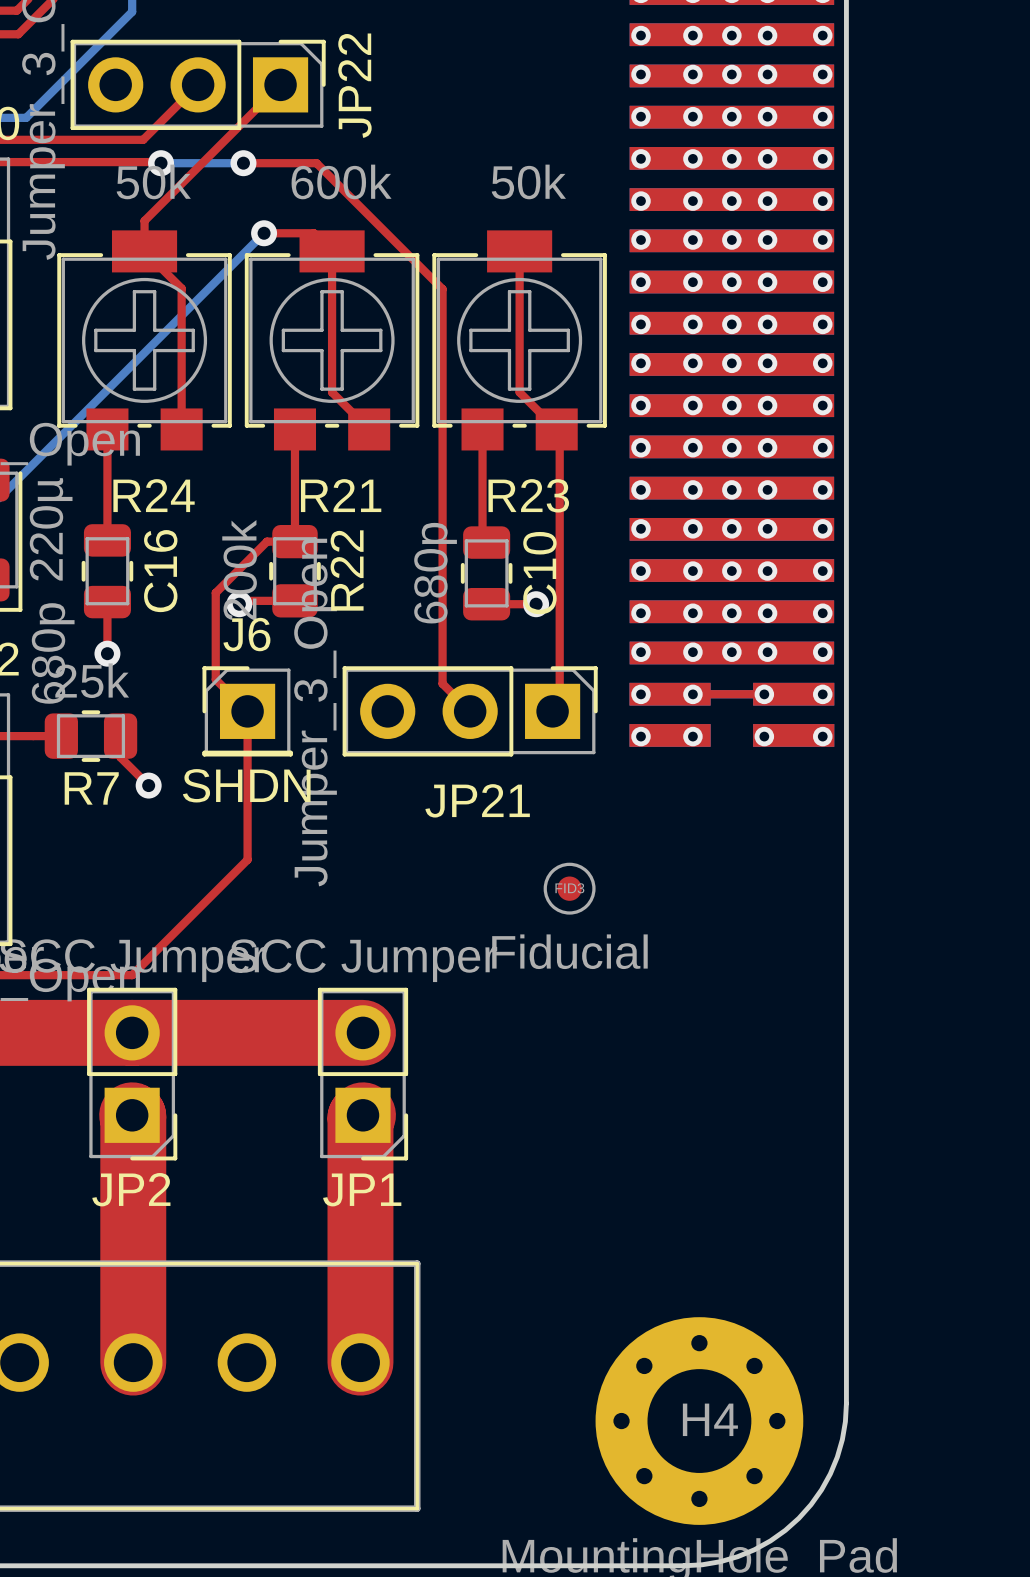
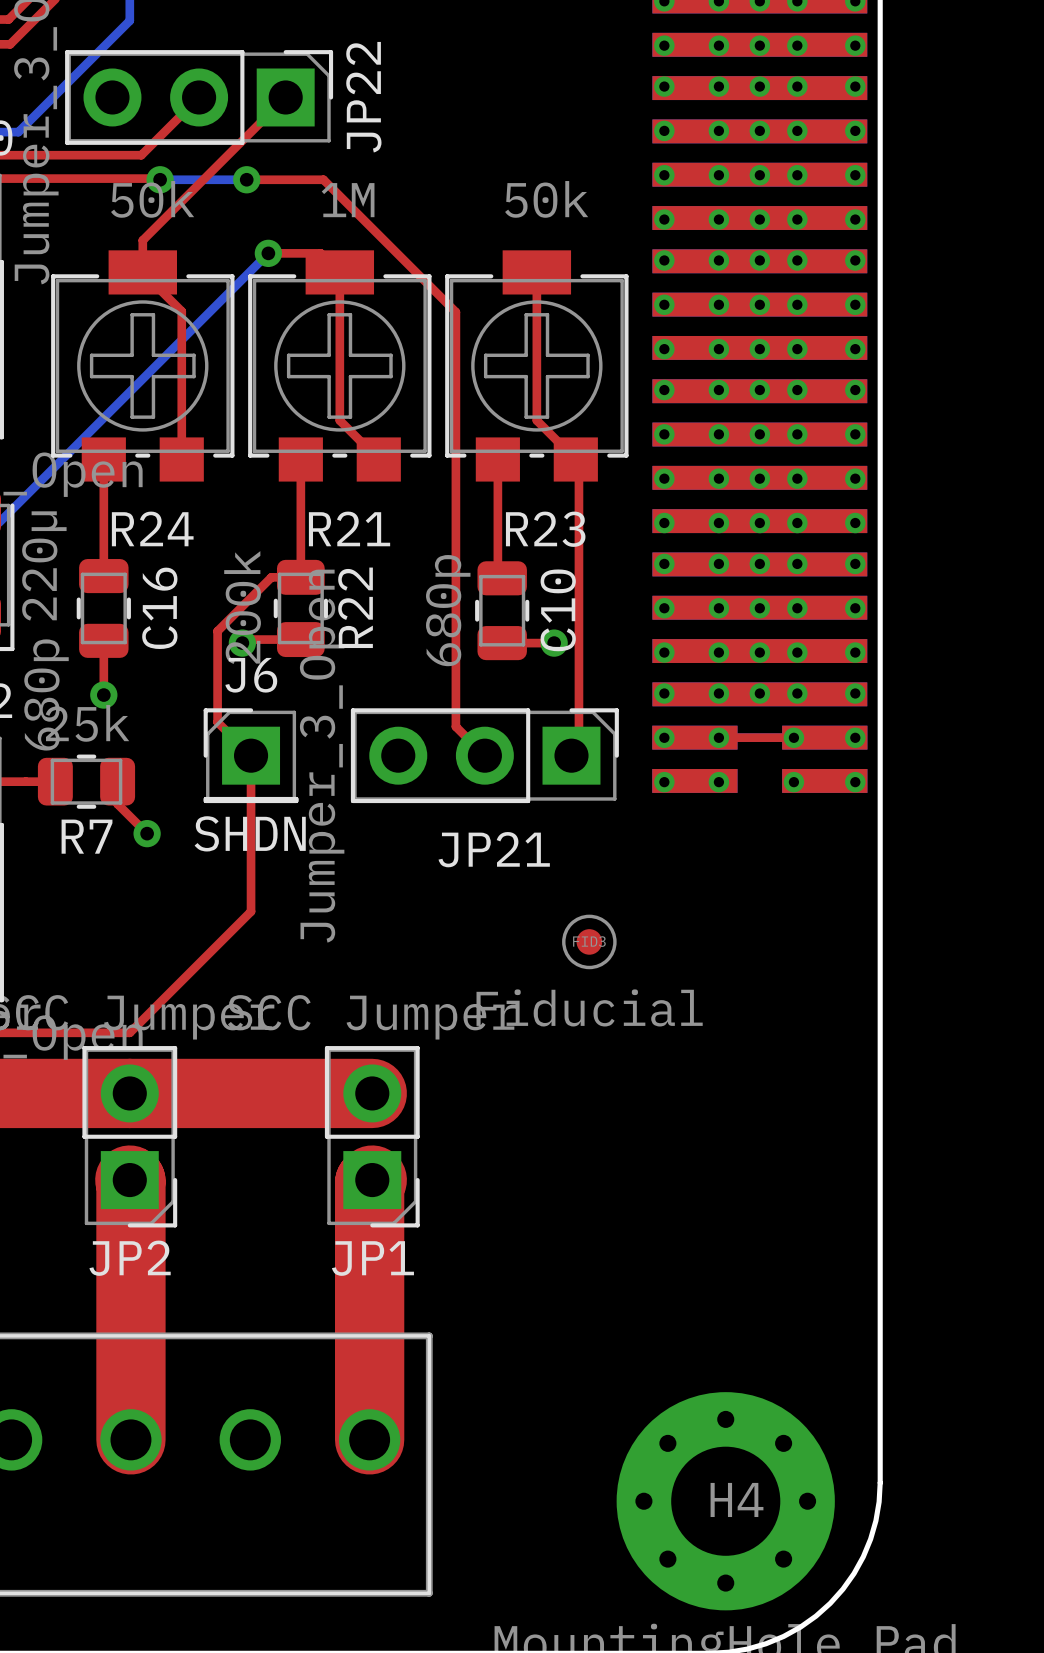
R21 value: 600k (341, 181) -> 1M (348, 200)

